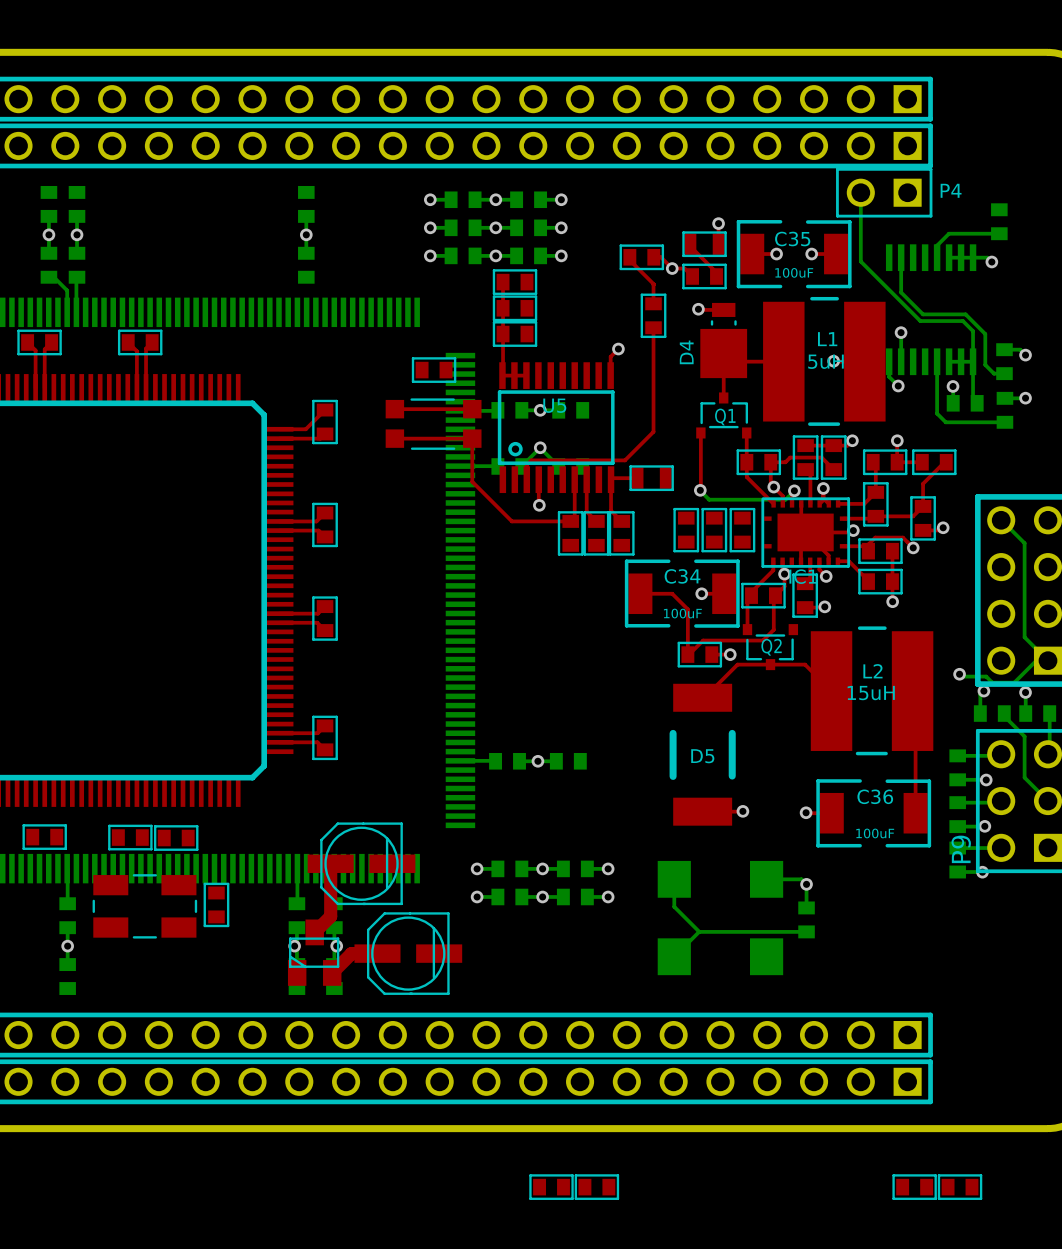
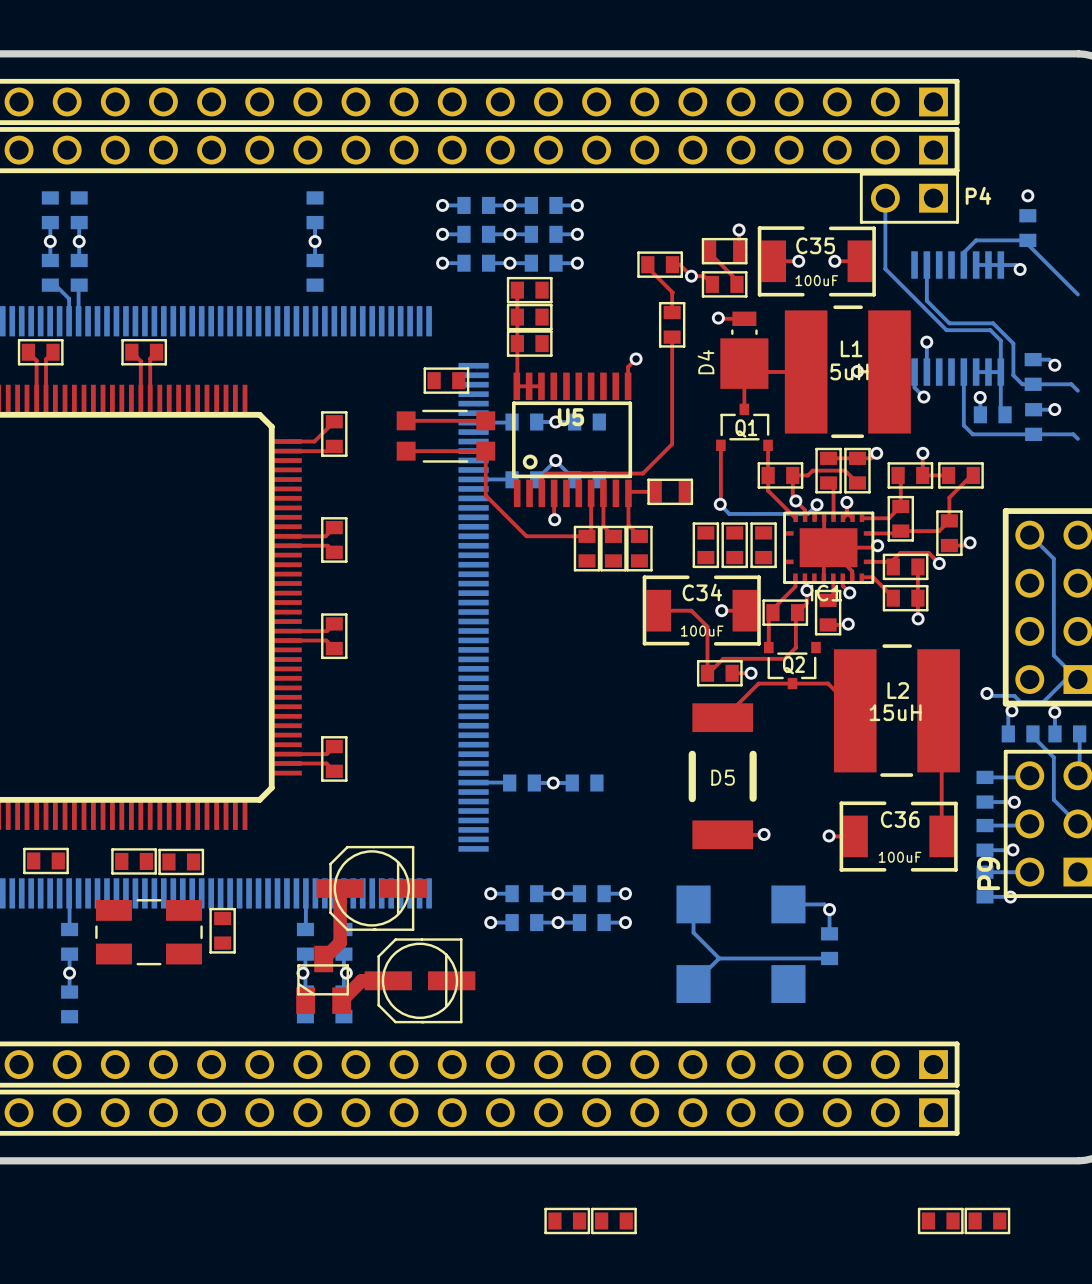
via: none -> (1027, 195)
bottom track: none -> (1027, 240) (1027, 244) (1077, 294)
bottom track: none -> (1033, 384) (1071, 384) (1077, 390)
bottom track: none -> (1033, 434) (1073, 434) (1077, 438)

